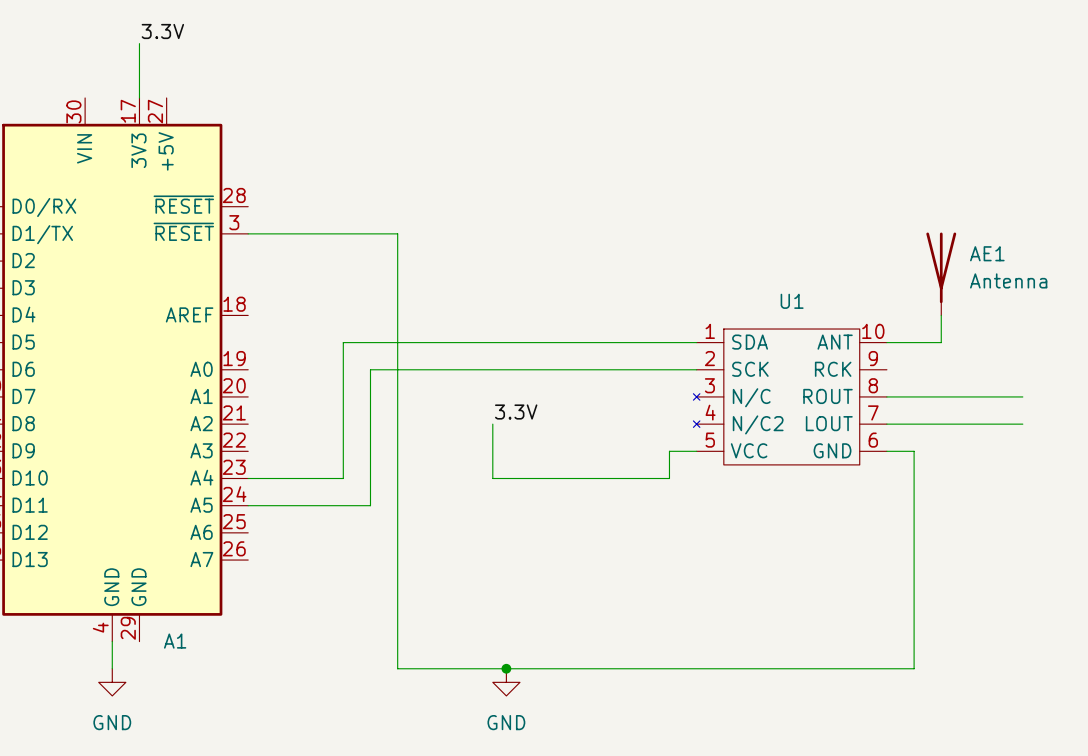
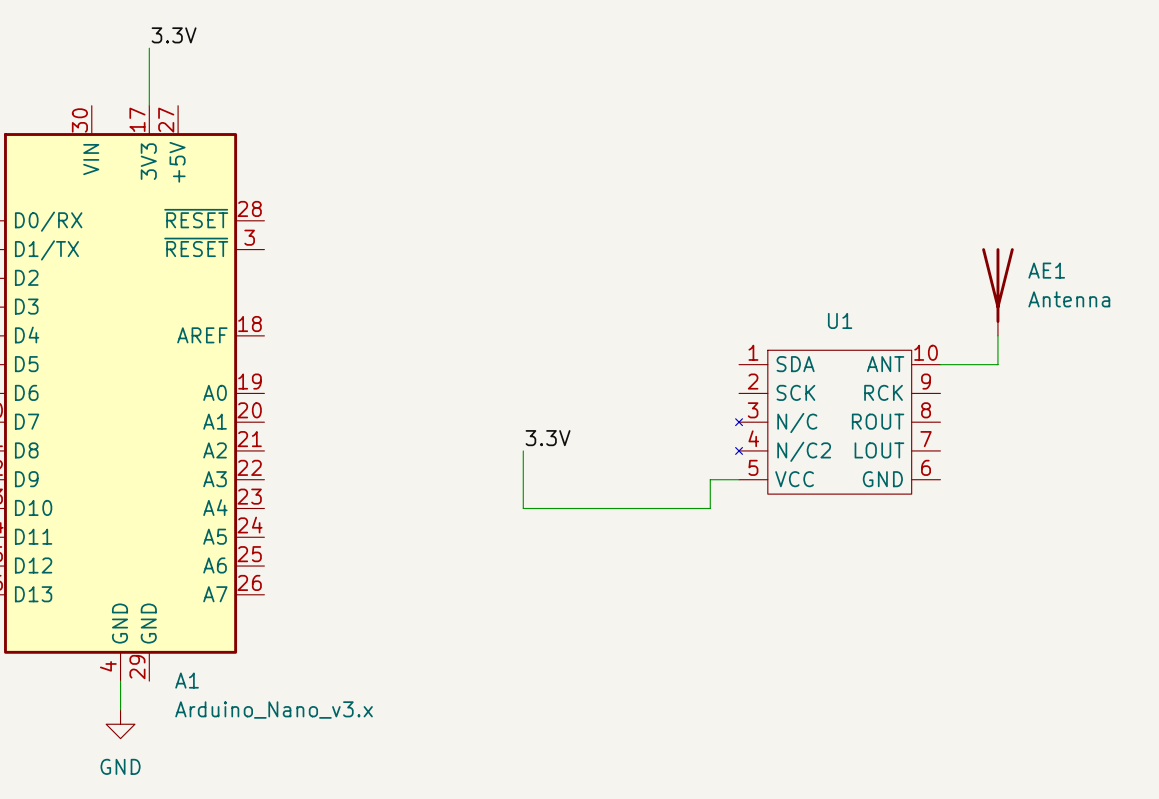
wire: (248, 233) (397, 233) (397, 668) (914, 668) (914, 451) (886, 451) -> none
wire: (696, 342) (343, 342) (343, 478) (248, 478) -> none
wire: (696, 369) (370, 369) (370, 505) (248, 505) -> none
wire: (886, 396) (1022, 396) -> none
wire: (886, 424) (1022, 424) -> none
A1 value: none -> Arduino_Nano_v3.x (274, 710)
junction: (506, 668) -> none
power symbol: GND (506, 682) -> none

